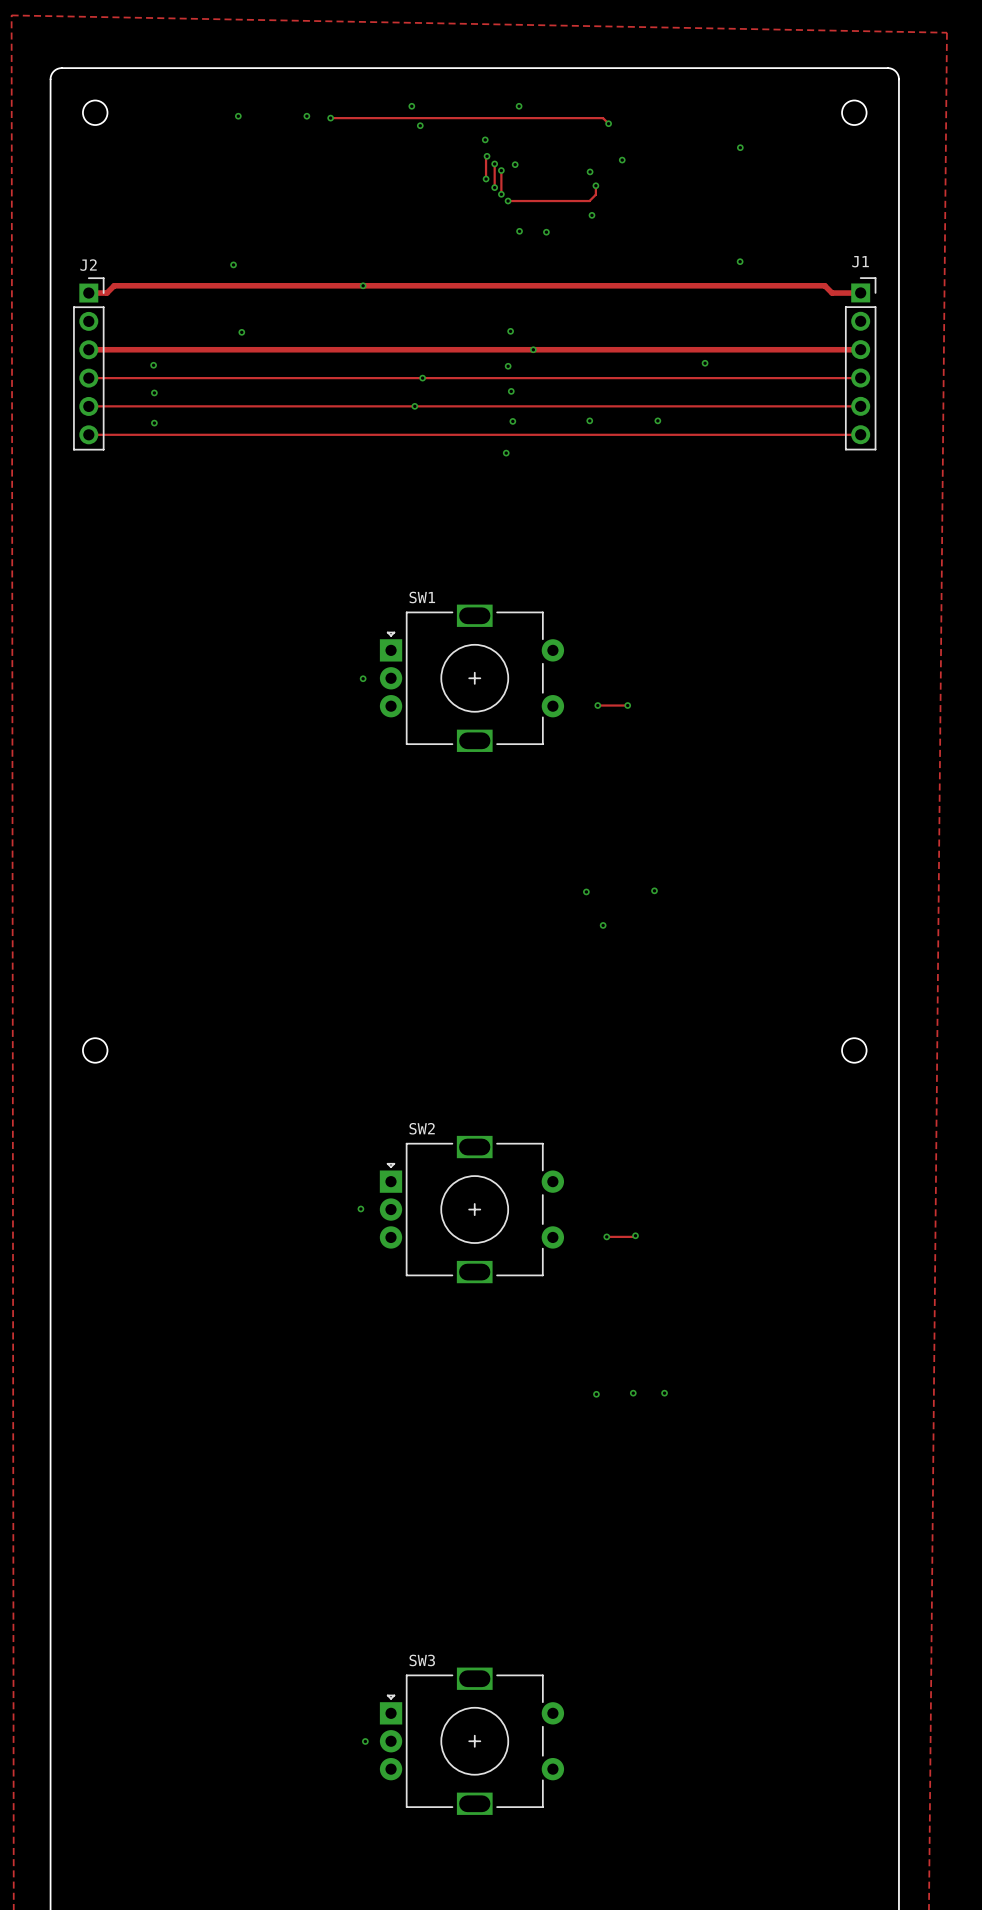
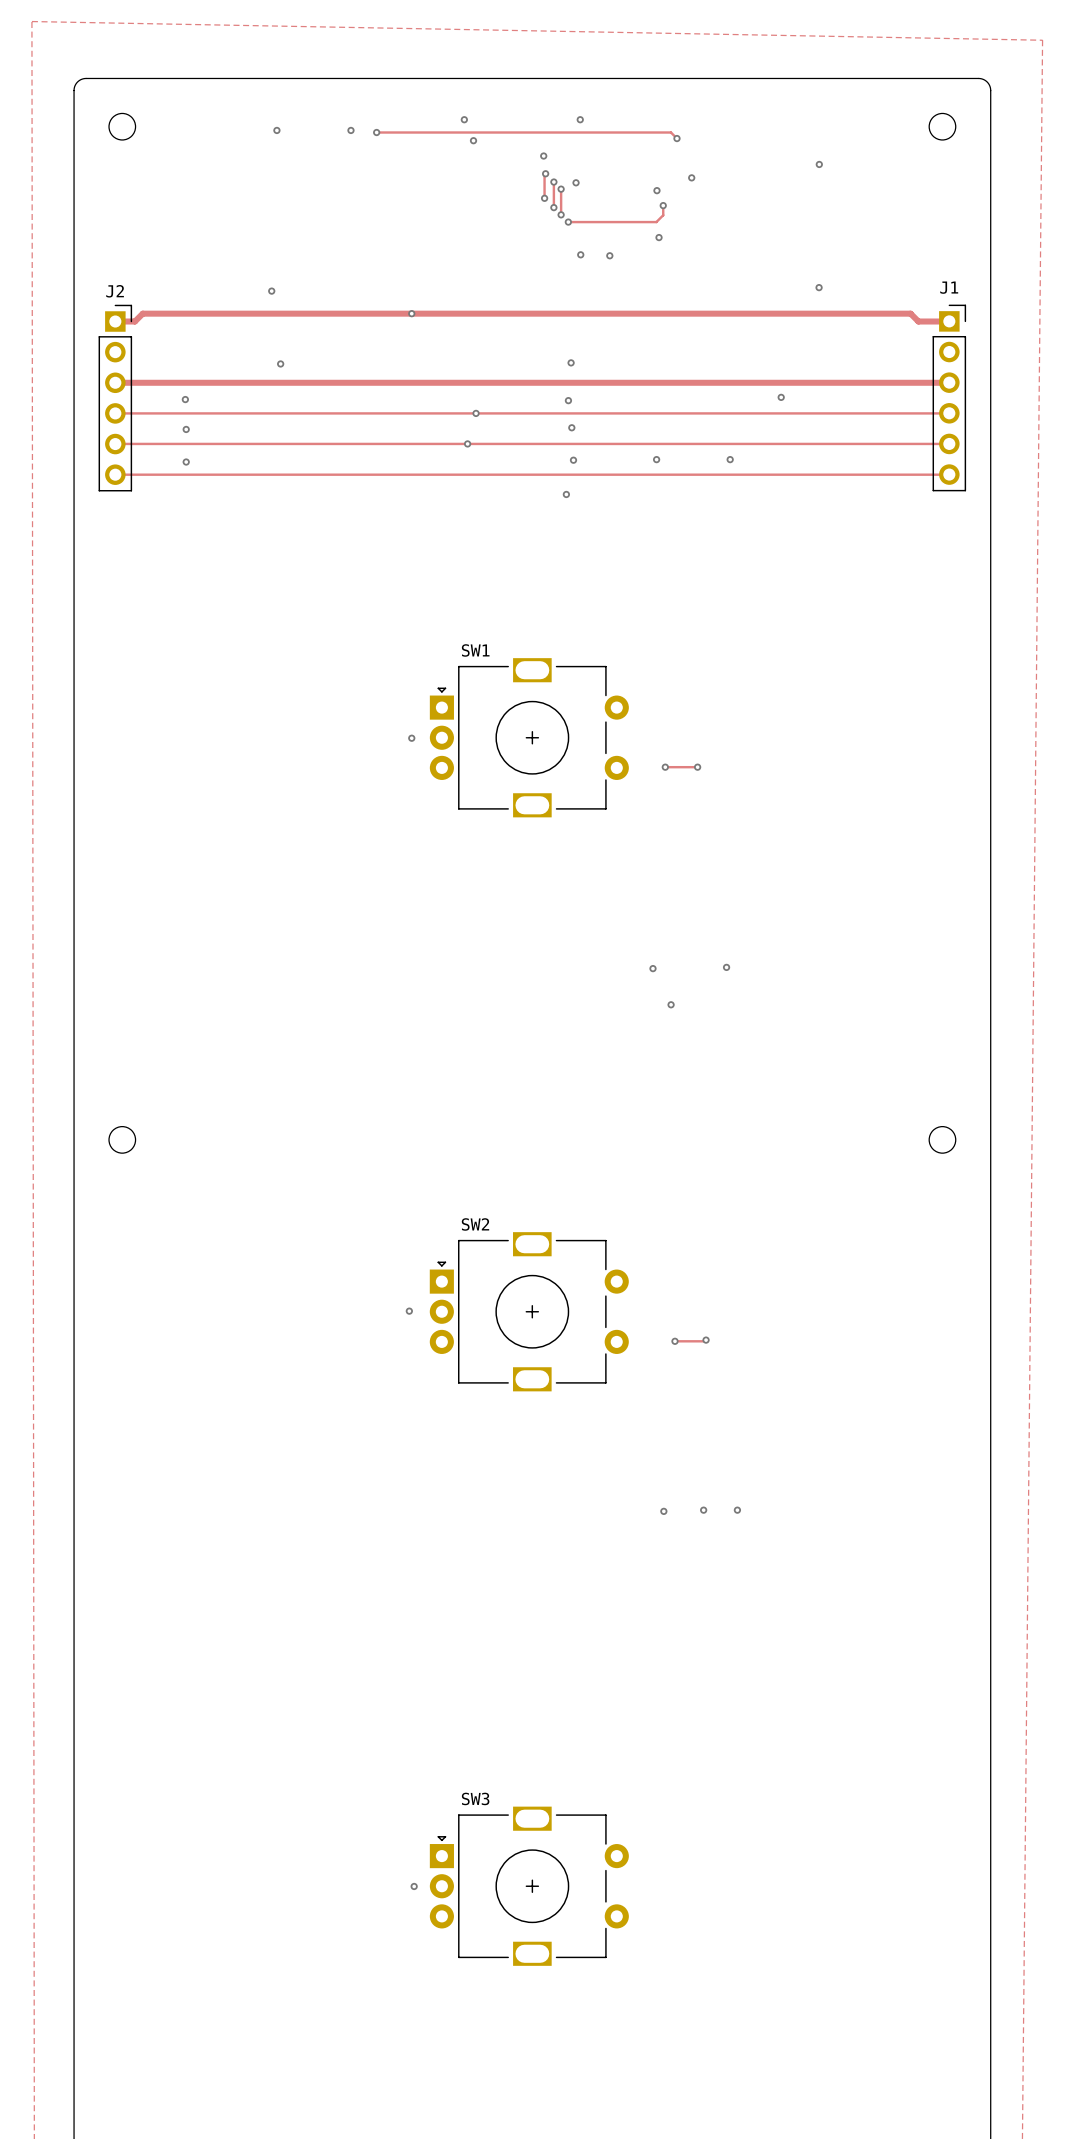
via: (533, 349) -> none

